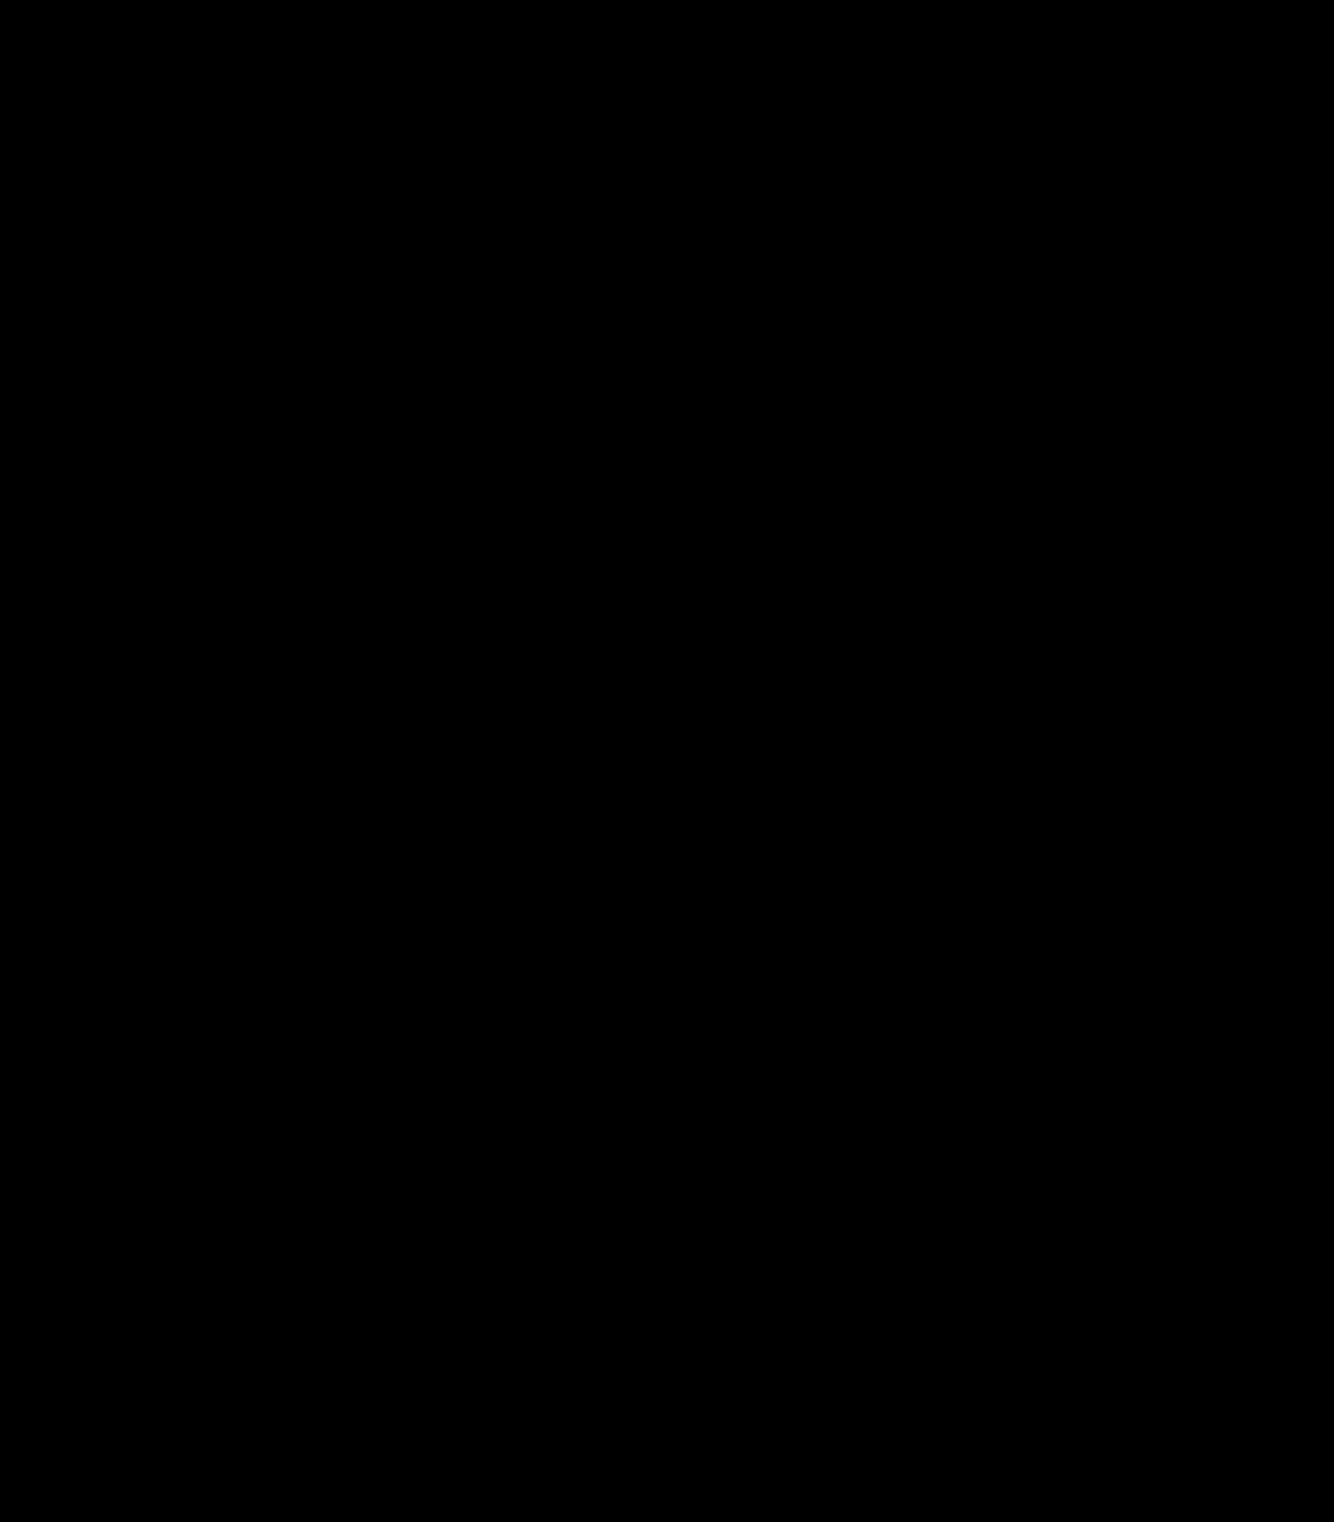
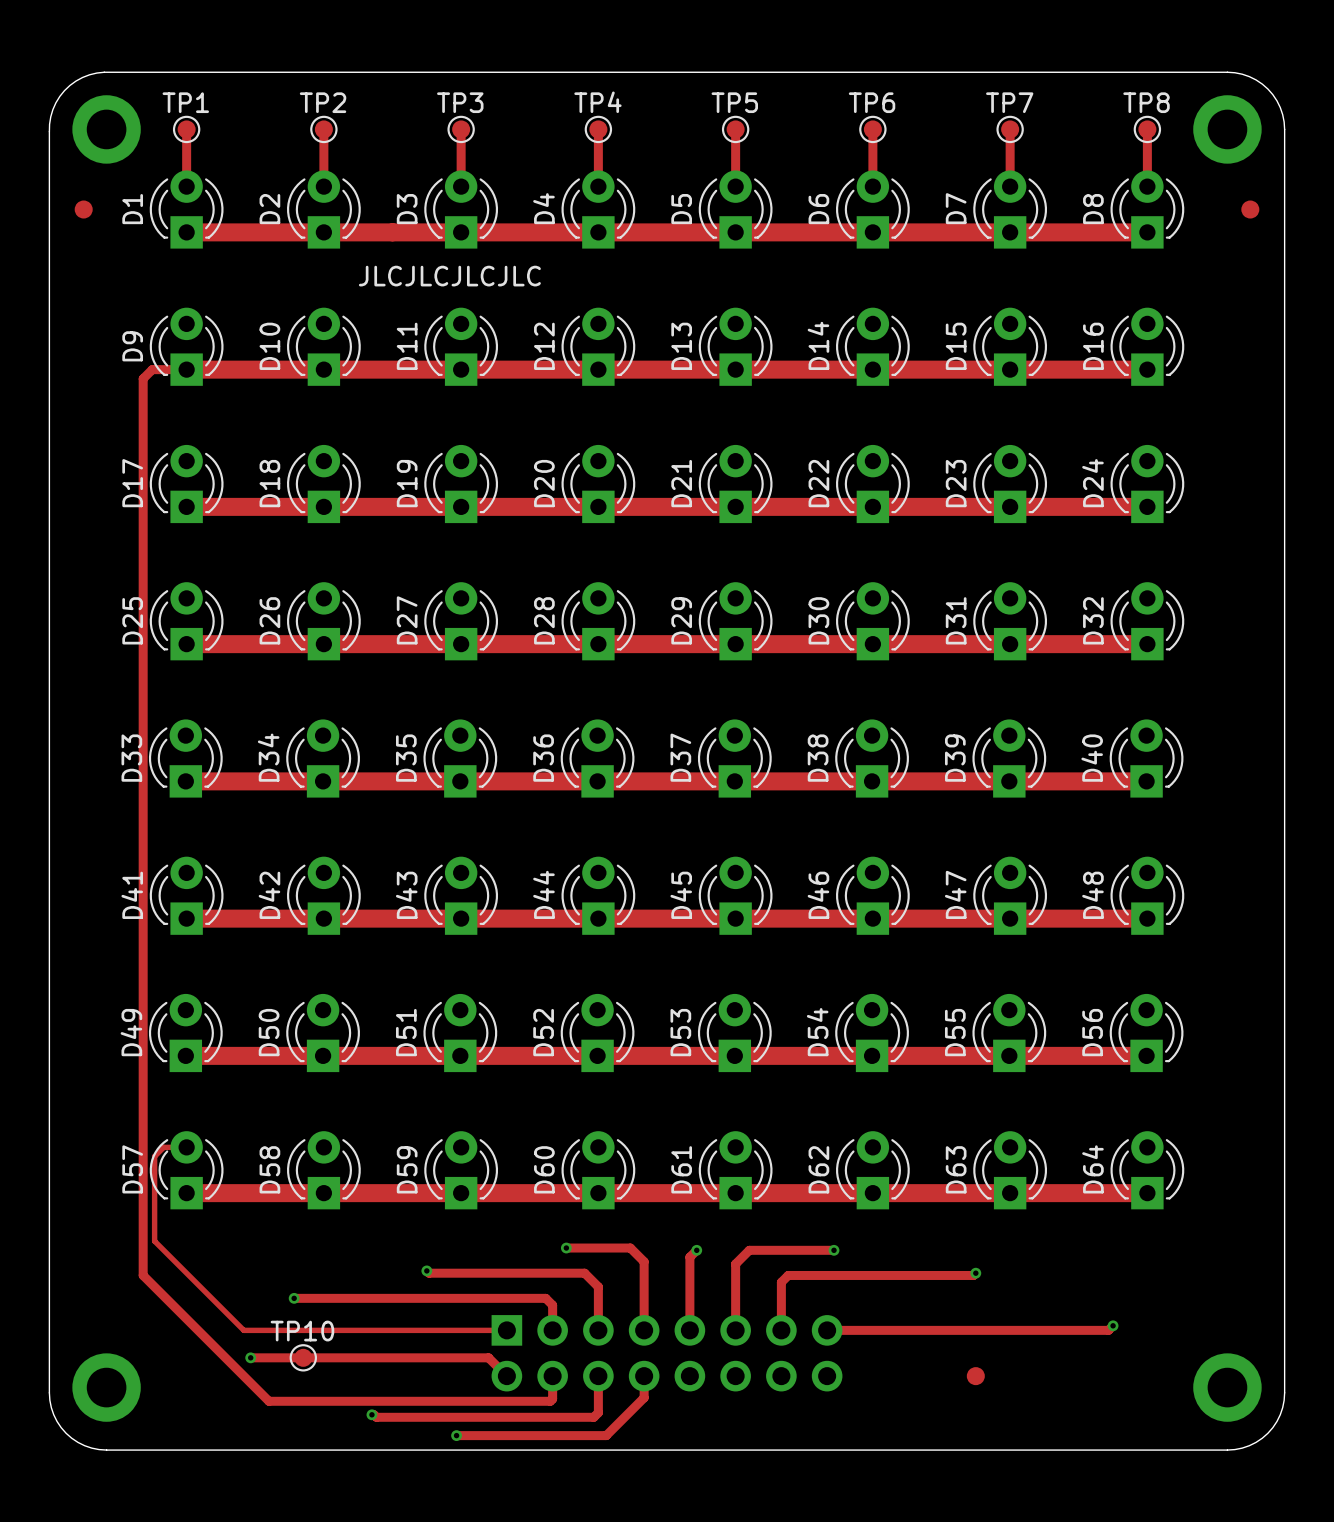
board edge: none -> (104, 72) (1227, 72) (1249, 76) (1262, 84) (1272, 94) (1282, 114) (1284, 129) (1284, 1392) (1280, 1414) (1272, 1427) (1262, 1438) (1242, 1448) (1227, 1450) (106, 1450) (91, 1448) (77, 1442) (61, 1427) (53, 1414) (49, 1392) (49, 124) (55, 102) (69, 85) (89, 74) (104, 72)
part: none -> (106, 129)
track: none -> (186, 129) (186, 186)
TP1: none -> (186, 129)
track: none -> (323, 129) (323, 186)
TP2: none -> (323, 129)
track: none -> (461, 129) (461, 186)
TP3: none -> (461, 129)
track: none -> (598, 129) (598, 186)
TP4: none -> (598, 129)
track: none -> (735, 129) (735, 186)
TP5: none -> (735, 129)
track: none -> (872, 129) (872, 186)
TP6: none -> (872, 129)
track: none -> (1010, 129) (1010, 186)
TP7: none -> (1010, 129)
track: none -> (1147, 129) (1147, 186)
TP8: none -> (1147, 129)
part: none -> (1227, 129)
part: none -> (83, 209)
D1: none -> (186, 209)
D2: none -> (323, 209)
D3: none -> (461, 209)
D4: none -> (598, 209)
D5: none -> (735, 209)
D6: none -> (872, 209)
D7: none -> (1010, 209)
D8: none -> (1147, 209)
part: none -> (1250, 209)
track: none -> (186, 232) (1147, 232)
text: none -> JLCJLCJLCJLC (449, 276)
D9: none -> (186, 346)
D10: none -> (323, 346)
D11: none -> (461, 346)
D12: none -> (598, 346)
D13: none -> (735, 346)
D14: none -> (872, 346)
D15: none -> (1010, 346)
D16: none -> (1147, 346)
track: none -> (1147, 369) (152, 369) (143, 378) (143, 1275) (268, 1401) (550, 1401) (552, 1399) (552, 1376)
D17: none -> (186, 484)
D18: none -> (323, 484)
D19: none -> (461, 484)
D20: none -> (598, 484)
D21: none -> (735, 484)
D22: none -> (872, 484)
D23: none -> (1010, 484)
D24: none -> (1147, 484)
track: none -> (186, 506) (1147, 506)
D25: none -> (186, 621)
D26: none -> (323, 621)
D27: none -> (461, 621)
D28: none -> (598, 621)
D29: none -> (735, 621)
D30: none -> (872, 621)
D31: none -> (1010, 621)
D32: none -> (1147, 621)
track: none -> (186, 644) (1147, 644)
D33: none -> (185, 758)
D34: none -> (323, 758)
D35: none -> (460, 758)
D36: none -> (597, 758)
D37: none -> (734, 758)
D38: none -> (872, 758)
D39: none -> (1009, 758)
D40: none -> (1146, 758)
track: none -> (185, 781) (1146, 781)
D41: none -> (186, 895)
D42: none -> (323, 895)
D43: none -> (461, 895)
D44: none -> (598, 895)
D45: none -> (735, 895)
D46: none -> (872, 895)
D47: none -> (1010, 895)
D48: none -> (1147, 895)
track: none -> (186, 918) (1147, 918)
D49: none -> (185, 1033)
D50: none -> (323, 1033)
D51: none -> (460, 1033)
D52: none -> (597, 1033)
D53: none -> (734, 1033)
D54: none -> (872, 1033)
D55: none -> (1009, 1033)
D56: none -> (1146, 1033)
track: none -> (185, 1055) (1146, 1055)
track: none -> (186, 1147) (163, 1147) (154, 1156) (154, 1241) (243, 1330) (506, 1330)
D57: none -> (186, 1170)
D58: none -> (323, 1170)
D59: none -> (461, 1170)
D60: none -> (598, 1170)
D61: none -> (735, 1170)
D62: none -> (872, 1170)
D63: none -> (1010, 1170)
D64: none -> (1147, 1170)
track: none -> (186, 1193) (1147, 1193)
track: none -> (566, 1248) (630, 1248) (644, 1261) (644, 1330)
via: none -> (566, 1248)
track: none -> (696, 1250) (689, 1257) (689, 1330)
via: none -> (696, 1250)
track: none -> (834, 1250) (749, 1250) (735, 1264) (735, 1330)
via: none -> (834, 1250)
track: none -> (426, 1270) (429, 1273) (584, 1273) (598, 1286) (598, 1330)
via: none -> (426, 1270)
track: none -> (975, 1273) (973, 1275) (788, 1275) (781, 1282) (781, 1330)
via: none -> (975, 1273)
track: none -> (294, 1296) (294, 1298) (545, 1298) (552, 1305) (552, 1330)
via: none -> (294, 1298)
track: none -> (1113, 1325) (1108, 1330) (827, 1330)
via: none -> (1113, 1325)
part: none -> (667, 1353)
track: none -> (250, 1357) (488, 1357) (506, 1376)
via: none -> (250, 1357)
TP10: none -> (303, 1357)
track: none -> (598, 1376) (598, 1412) (593, 1417) (376, 1417) (371, 1414)
track: none -> (644, 1376) (644, 1397) (606, 1435) (456, 1435)
part: none -> (975, 1376)
part: none -> (106, 1387)
part: none -> (1227, 1387)
via: none -> (371, 1414)
via: none -> (456, 1435)

